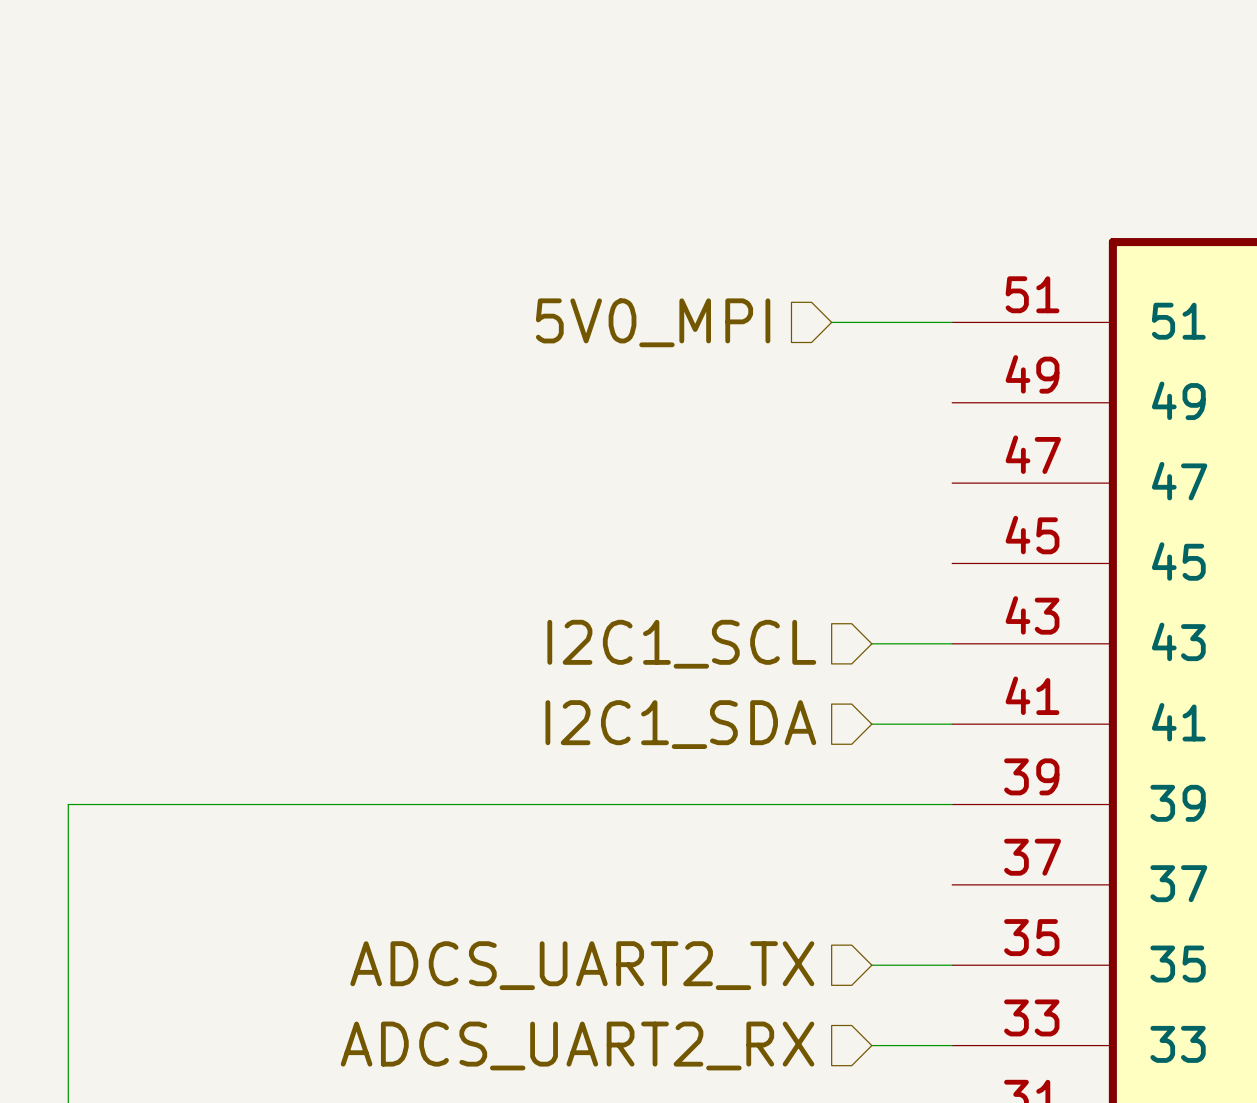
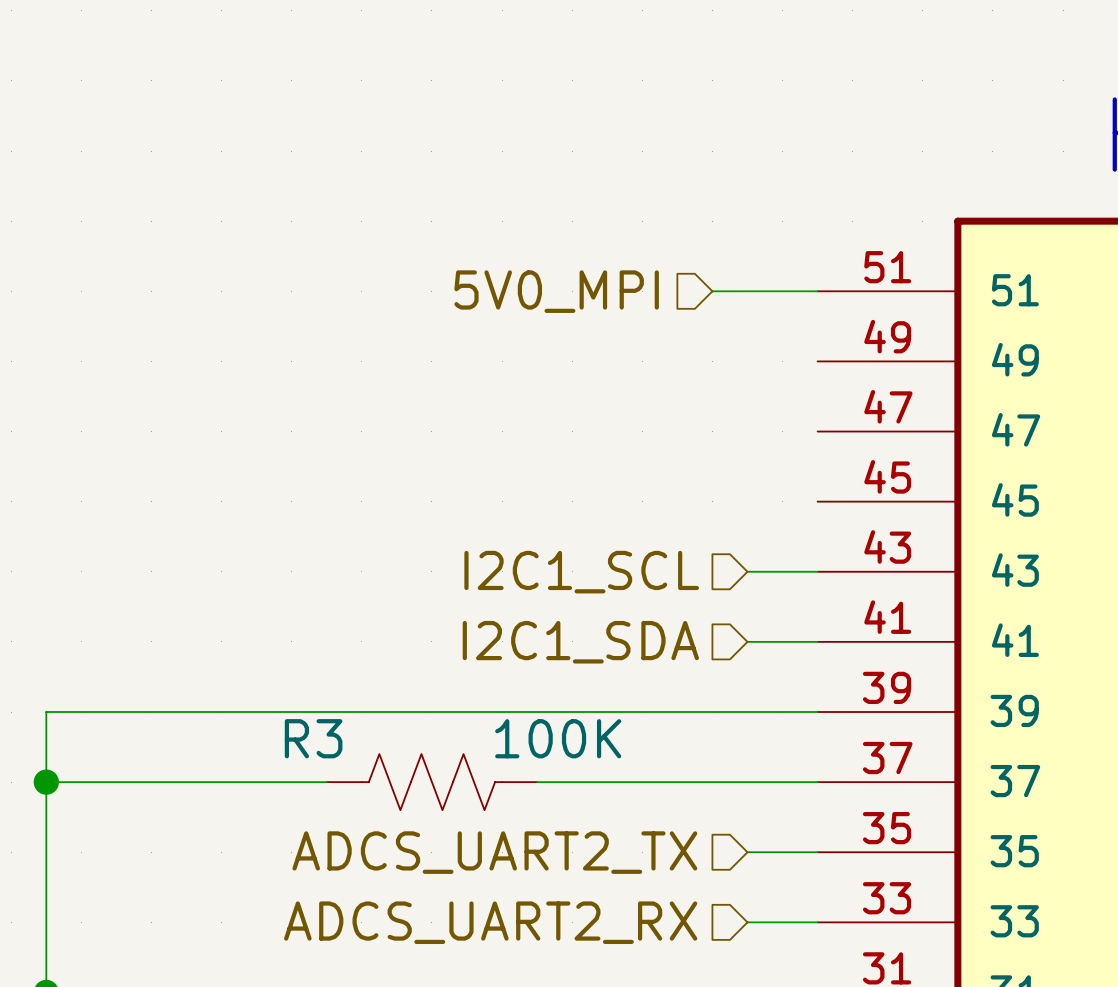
wire: none -> (46, 782) (326, 782)
junction: none -> (46, 782)
R3: none -> 100K (431, 782)
wire: none -> (537, 782) (817, 782)

